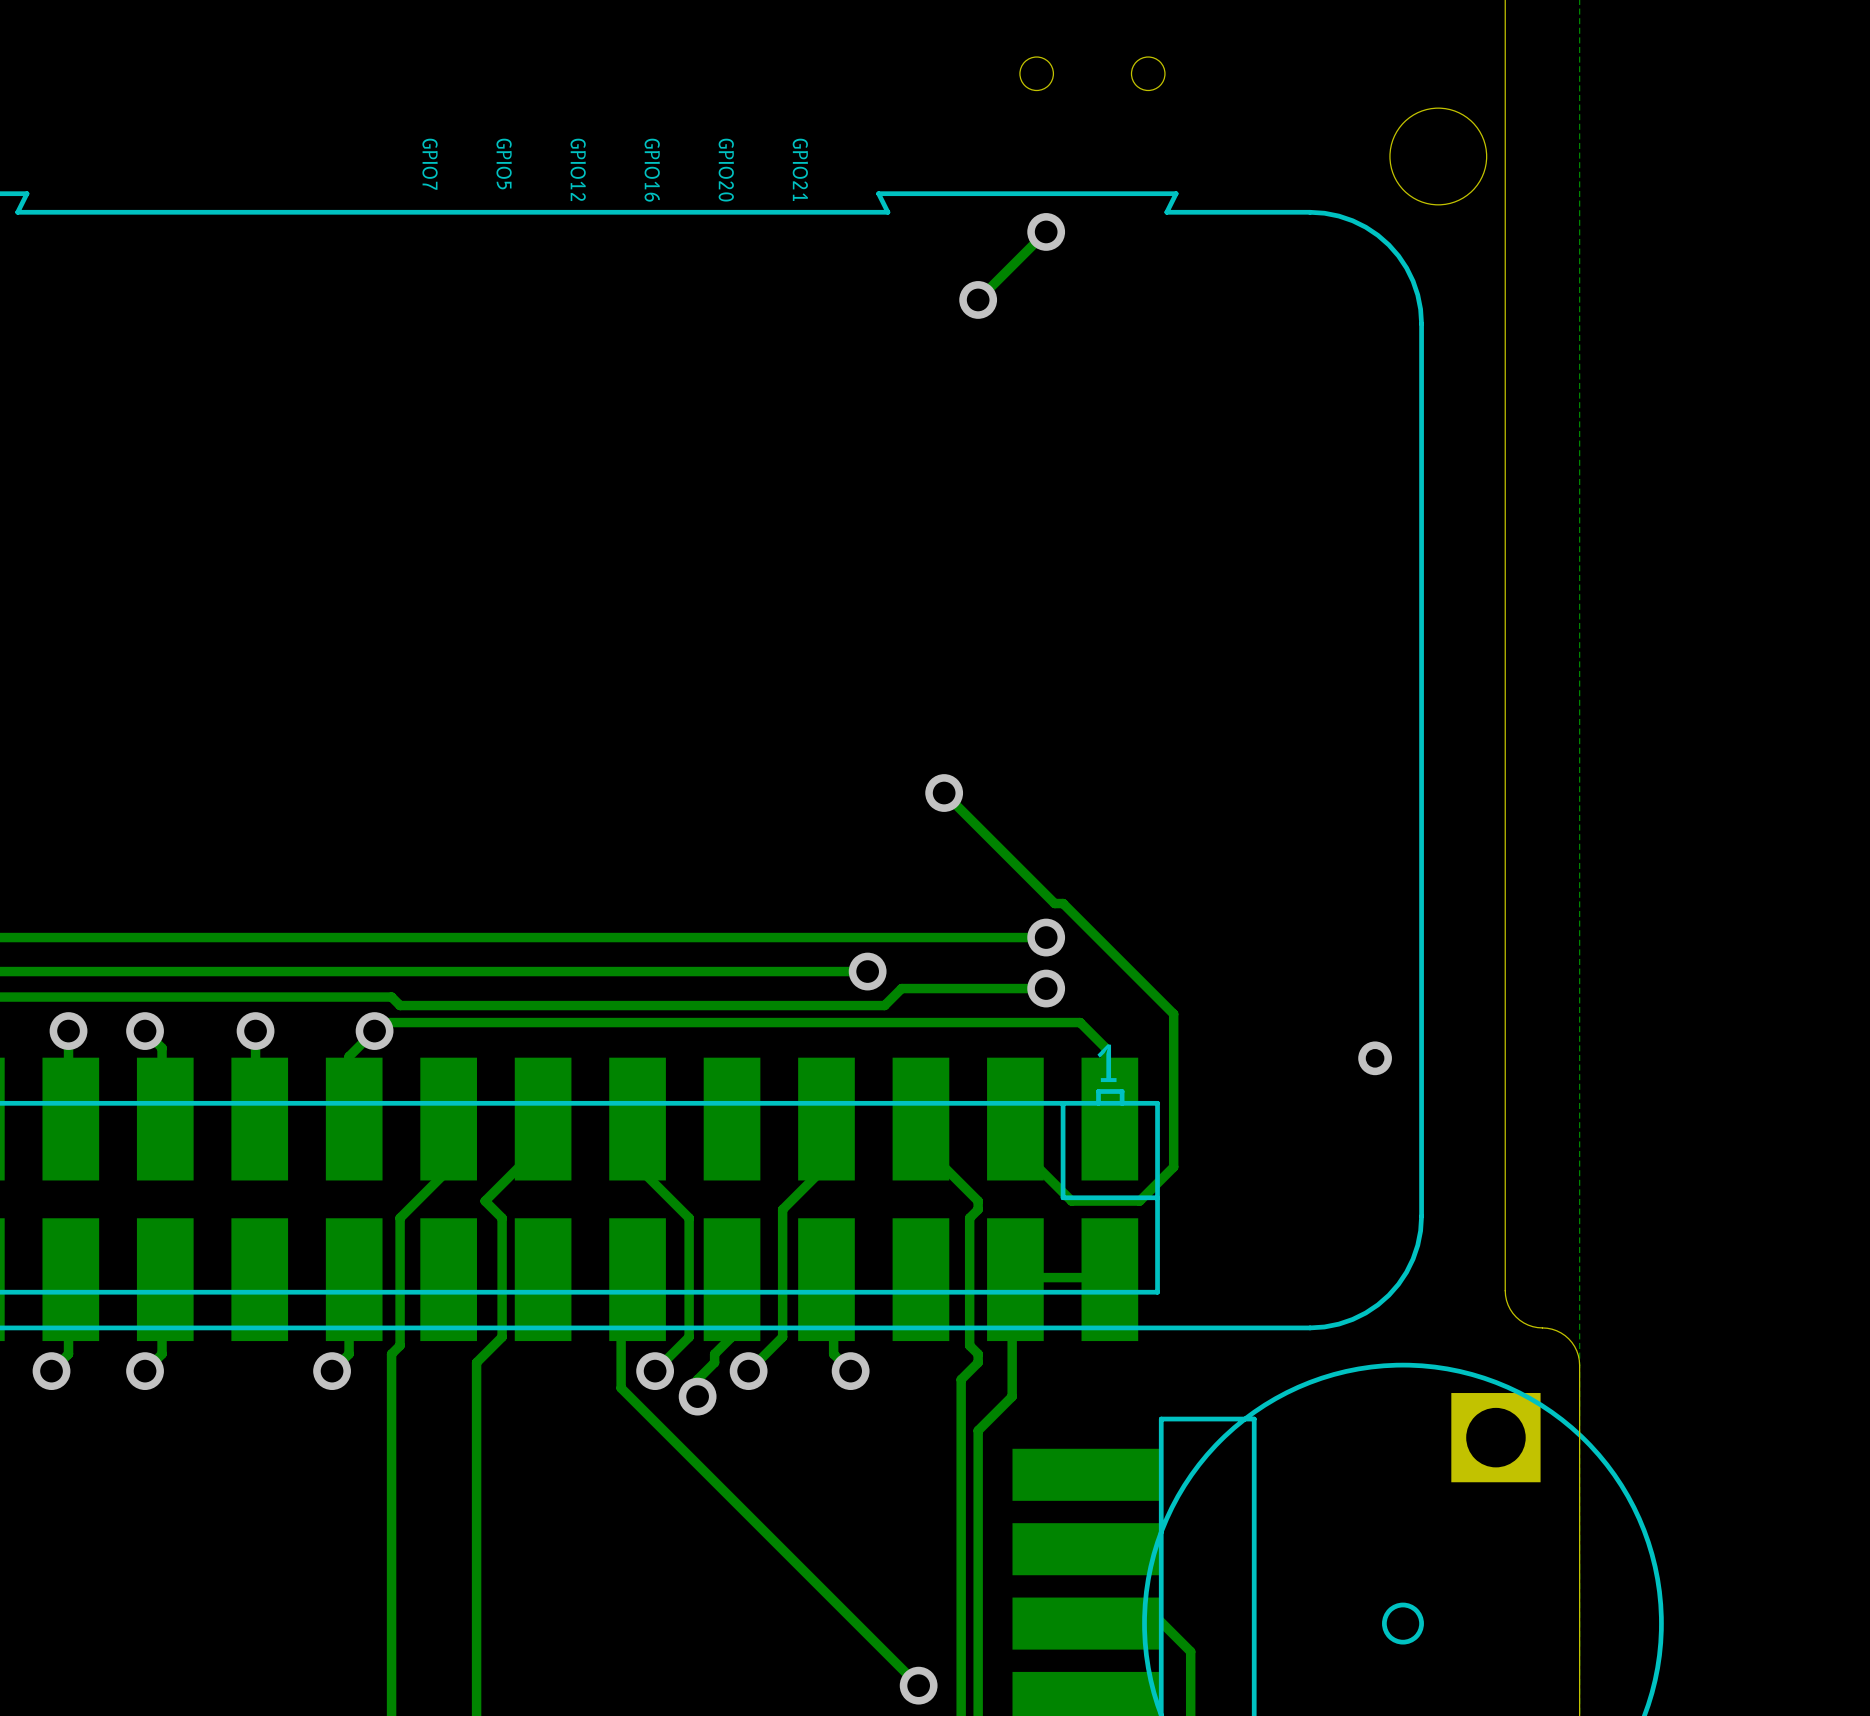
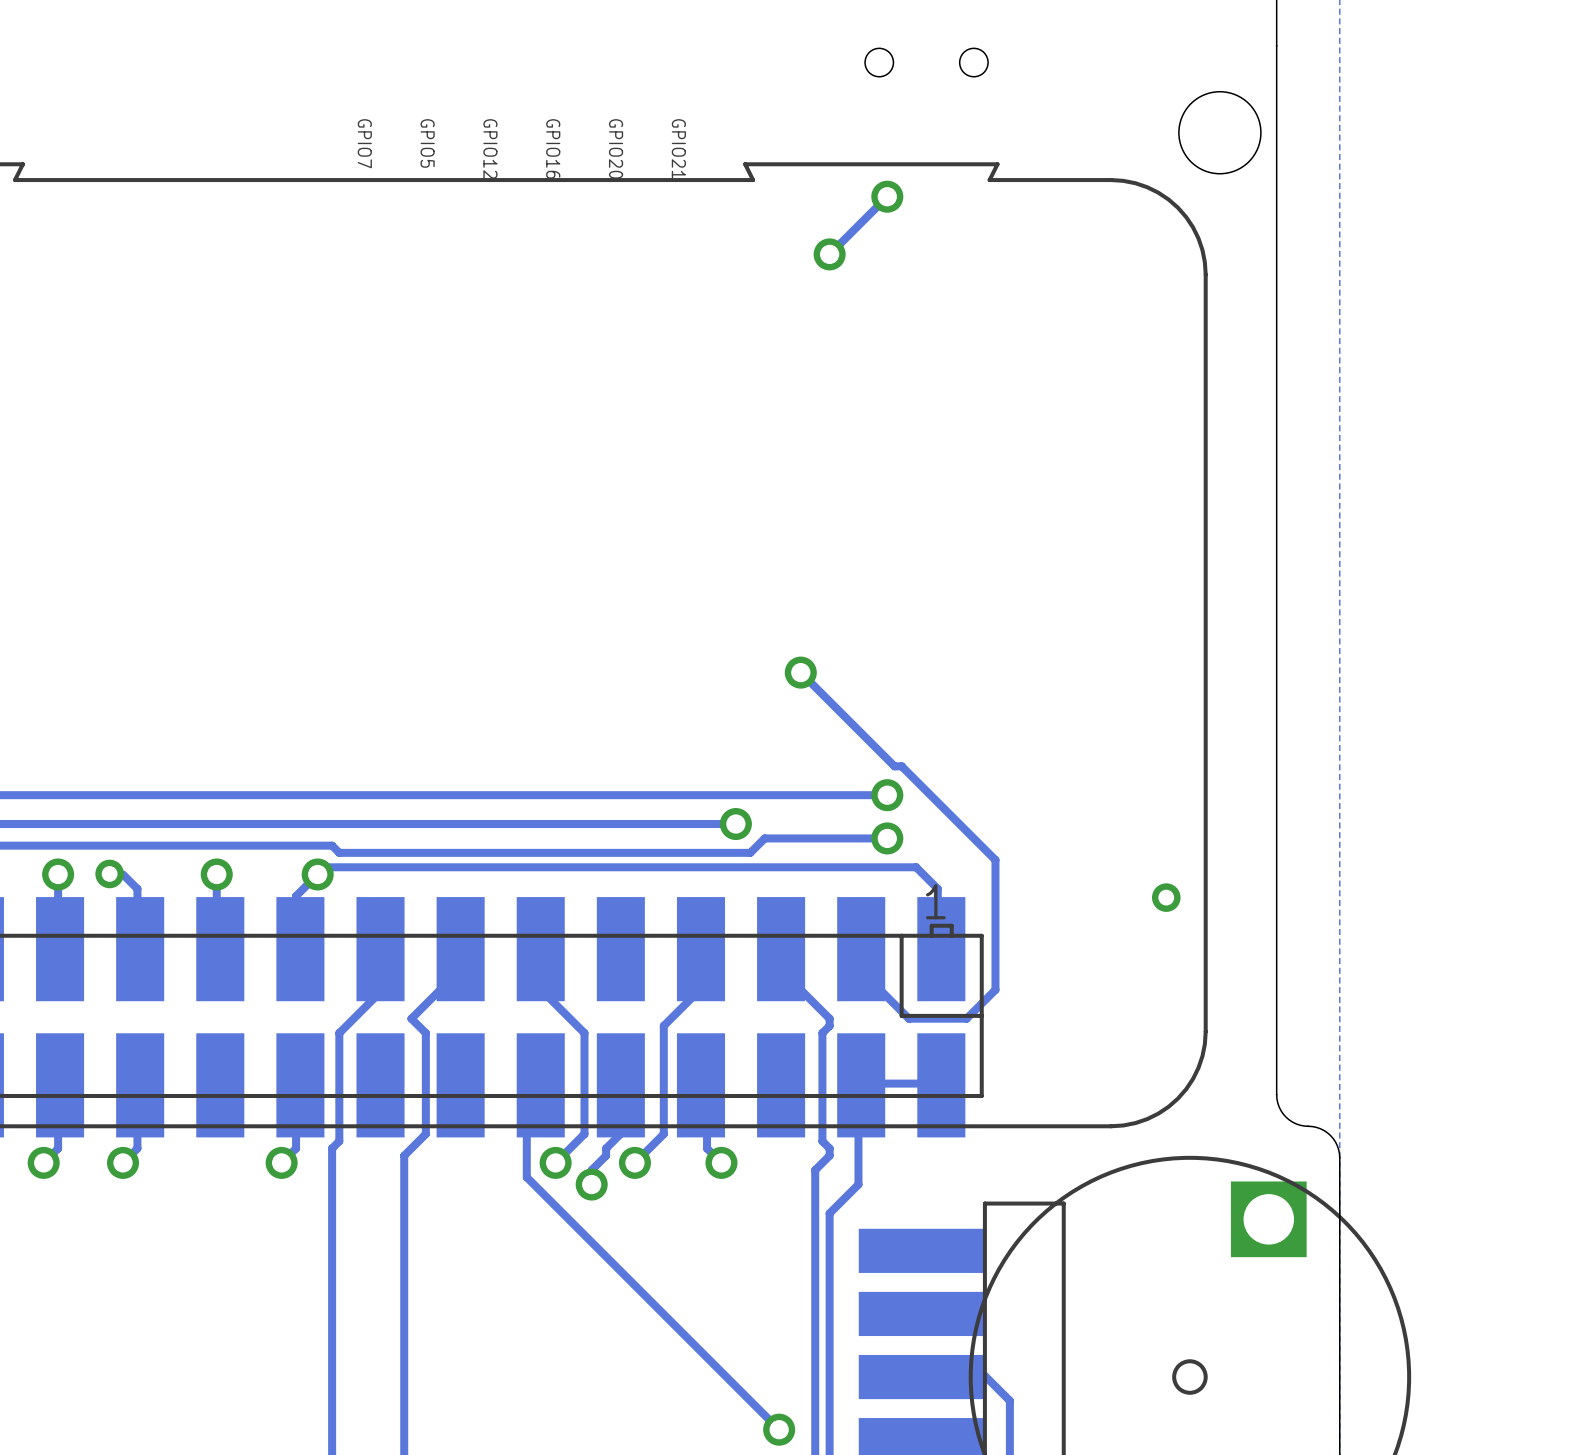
via position: (145, 1031) -> (109, 873)

